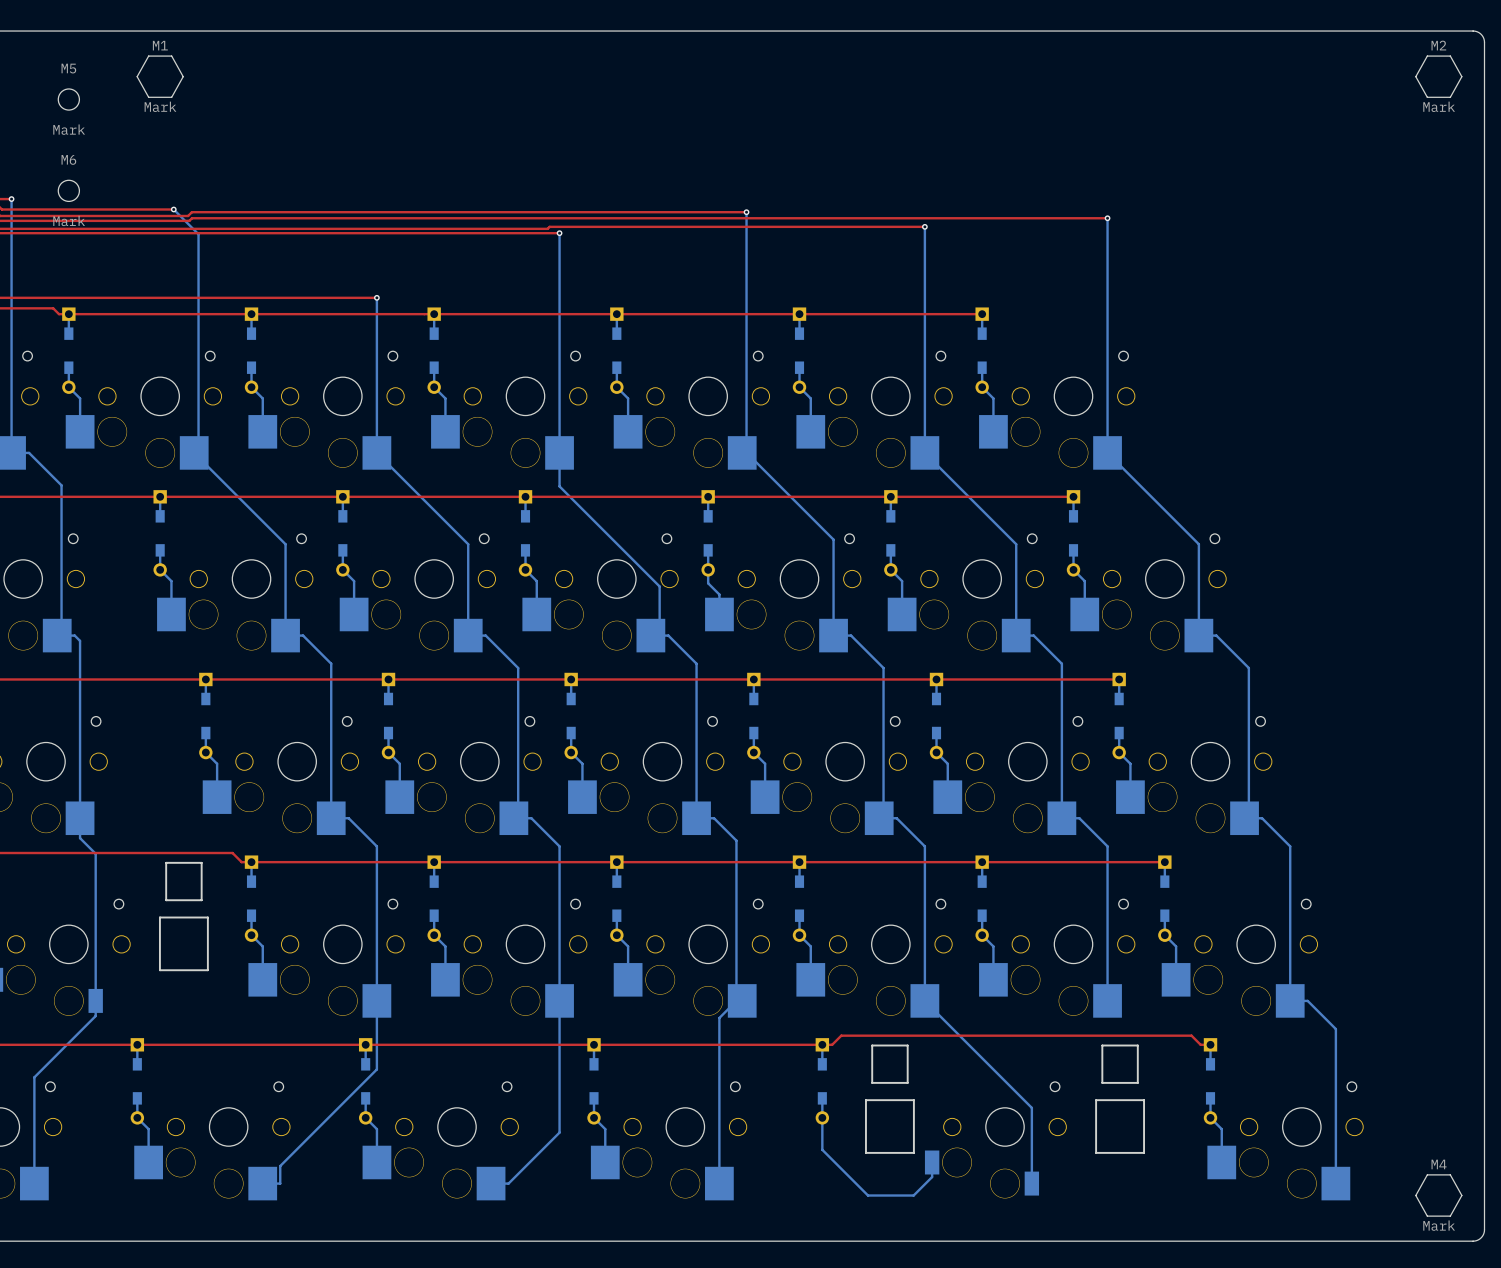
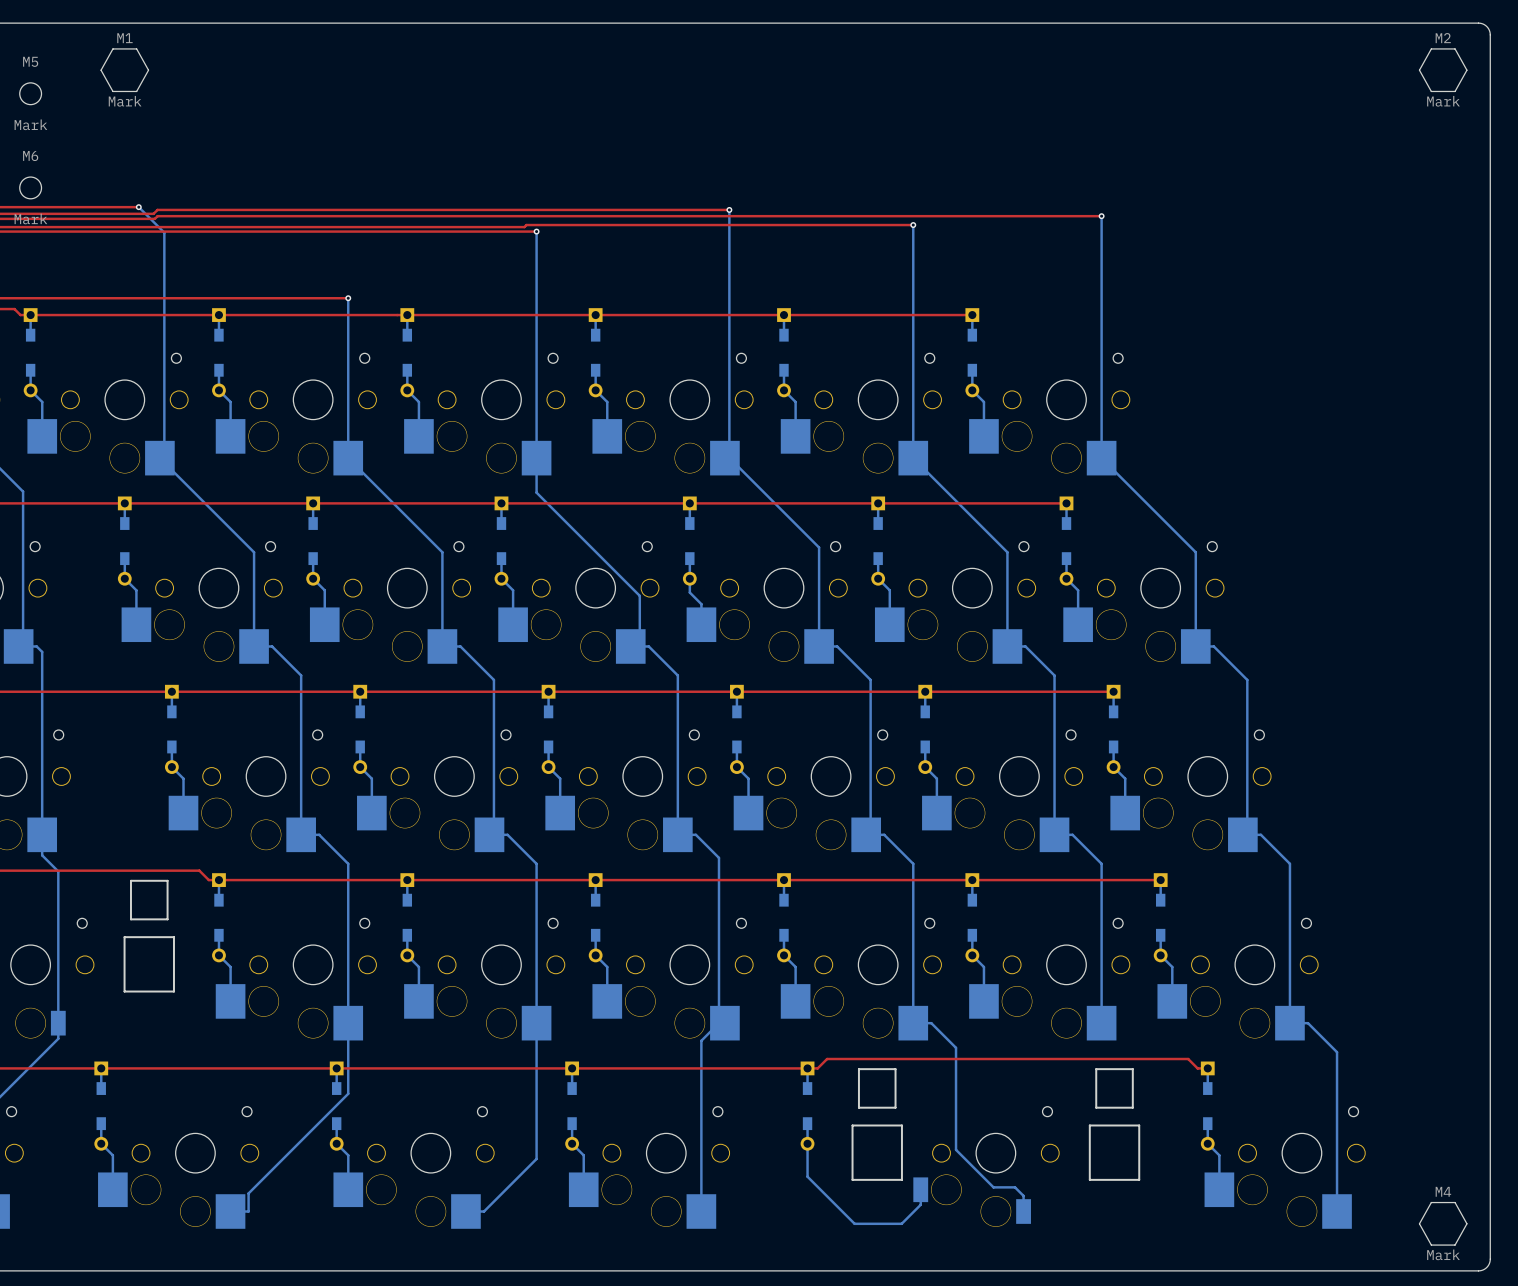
bottom track: (924, 1000) (1031, 1107) (1031, 1168) -> (913, 1023) (931, 1023) (956, 1047) (956, 1149) (993, 1187) (1015, 1187) (1023, 1195)

